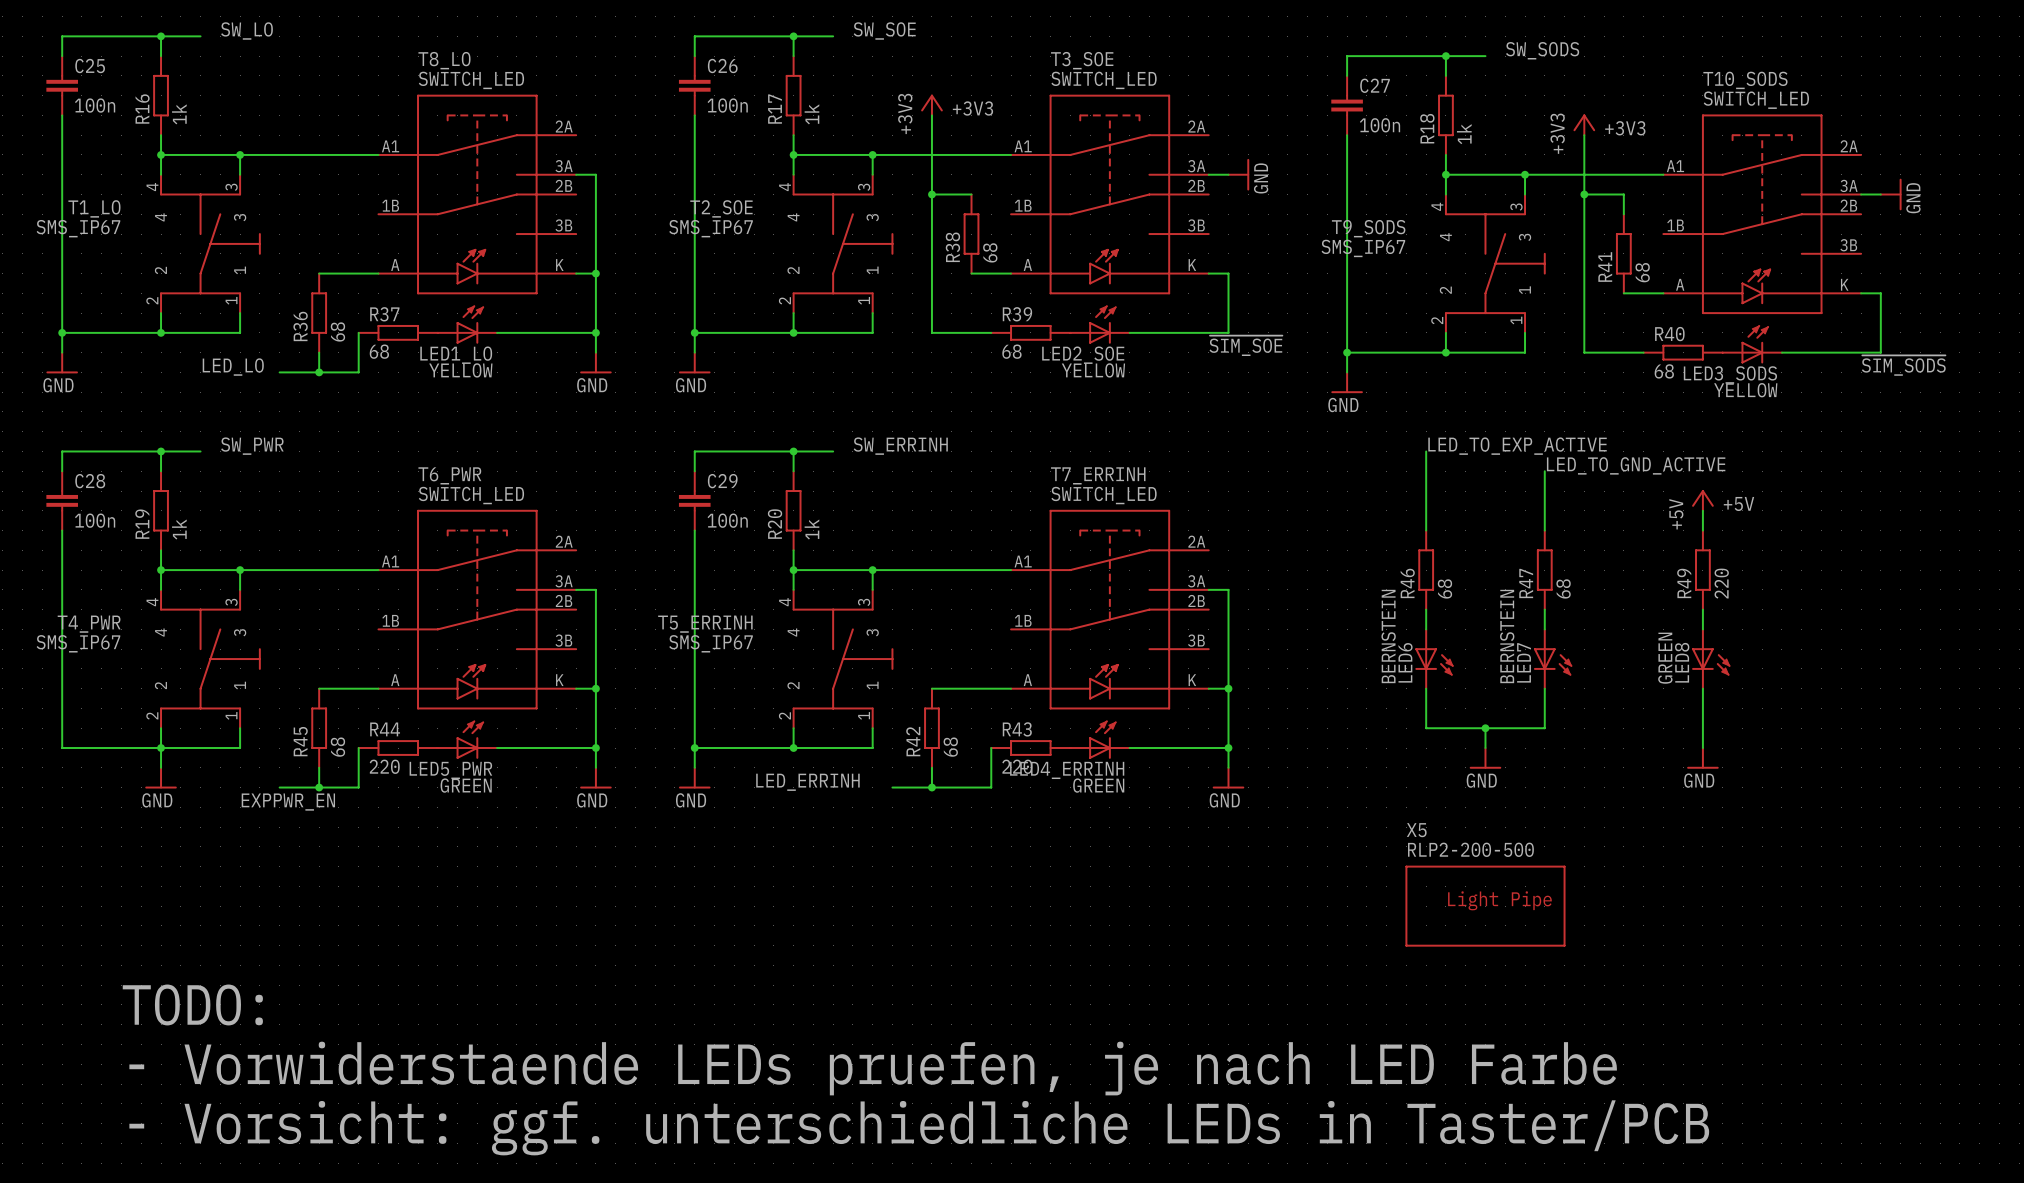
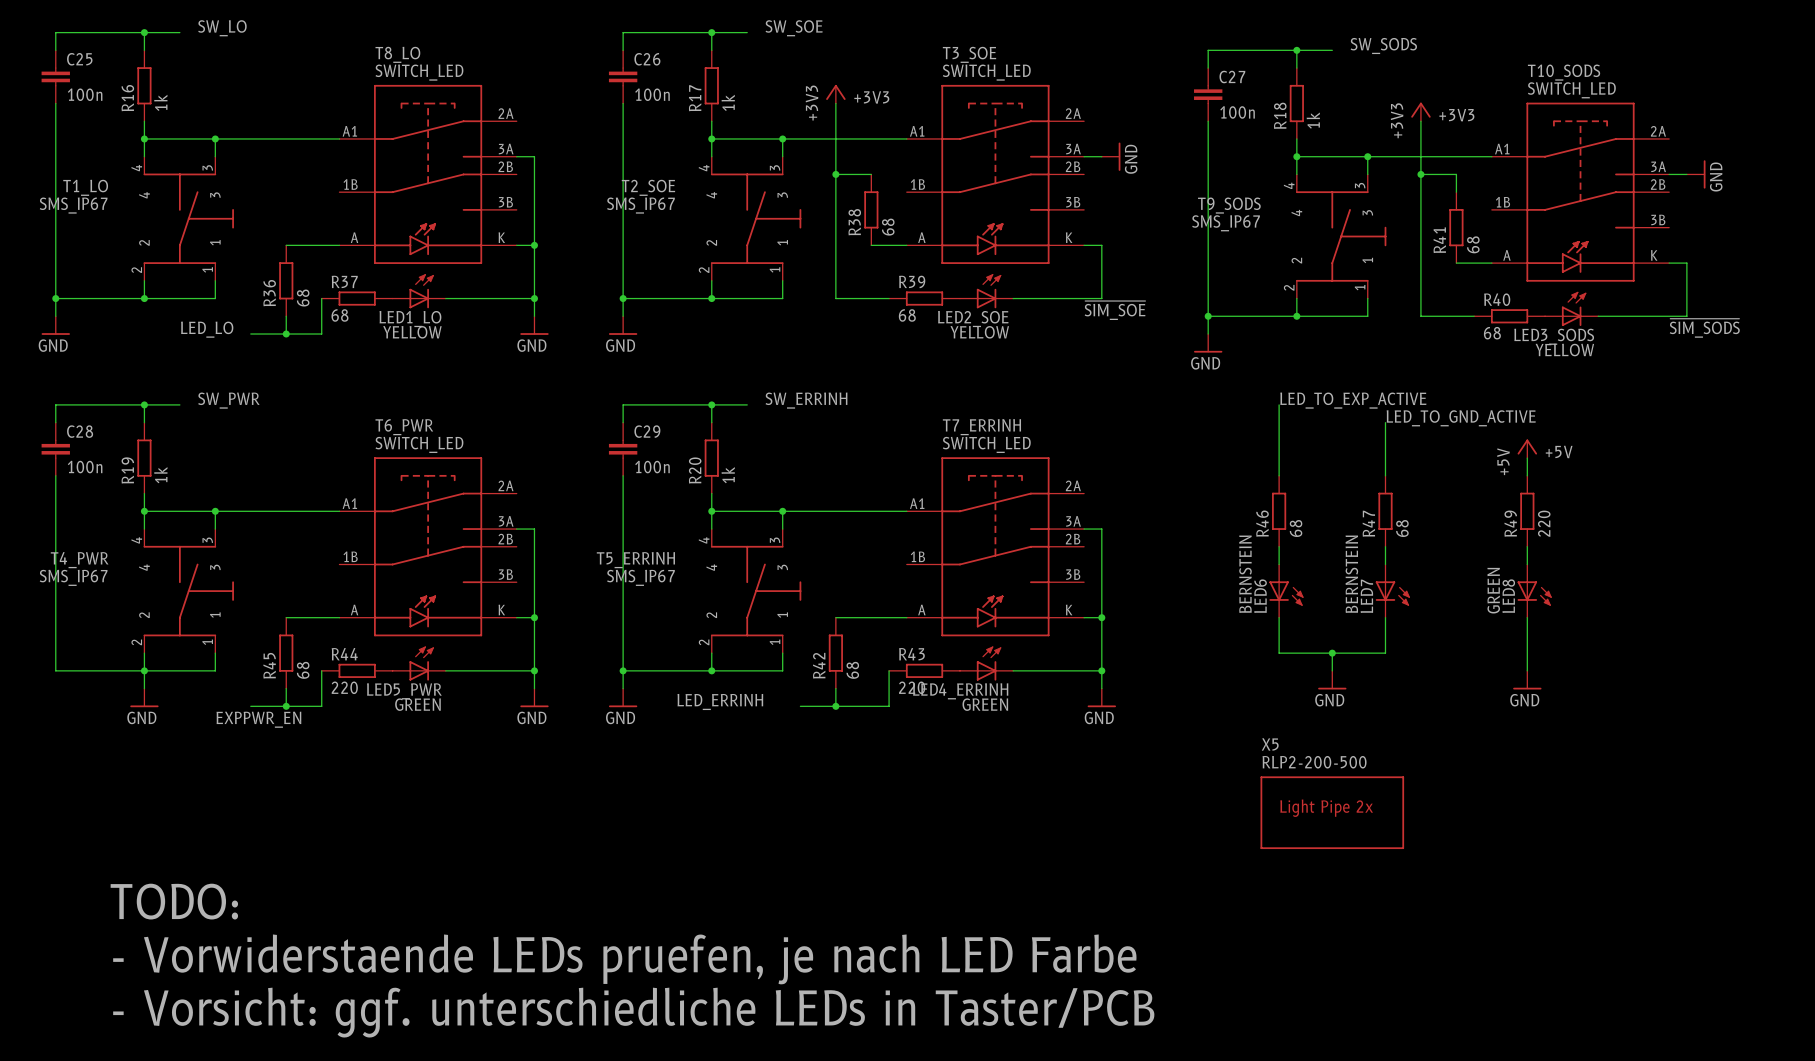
X5 text: none -> Light Pipe 2x (1326, 808)
X5 text: Light Pipe (1499, 900) -> none

